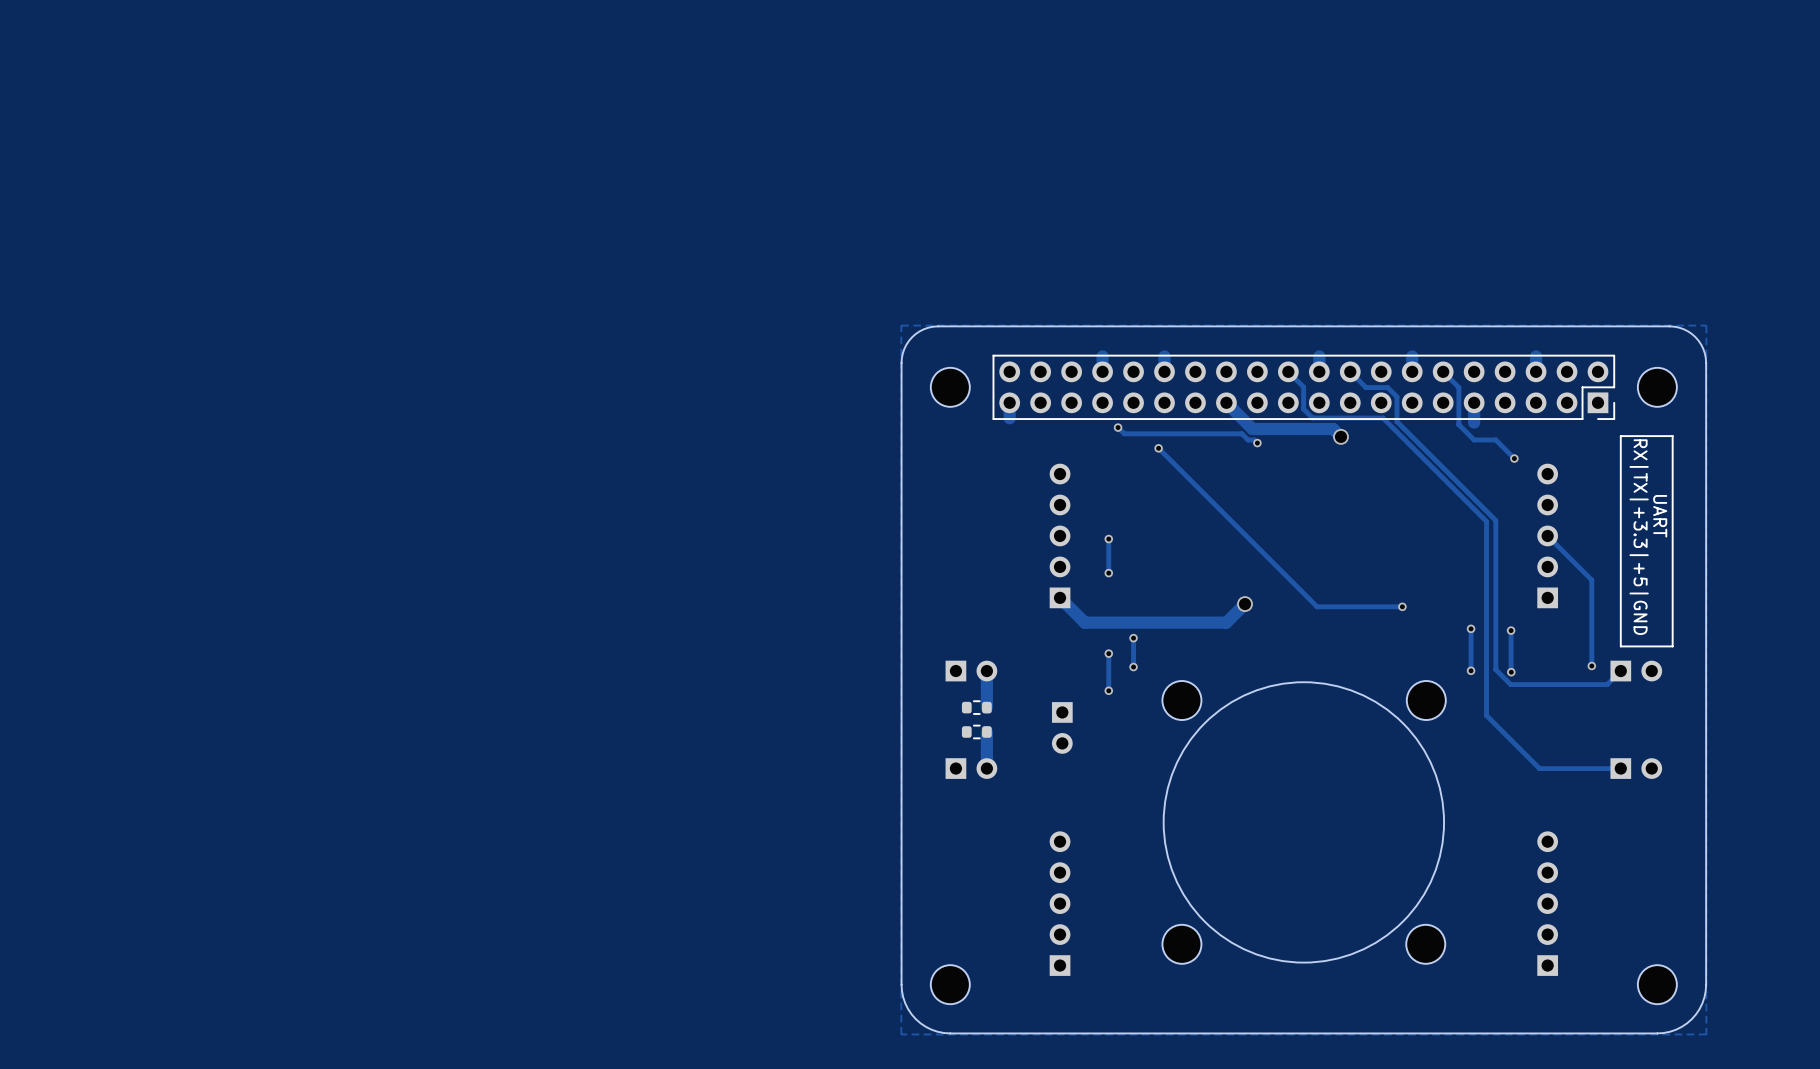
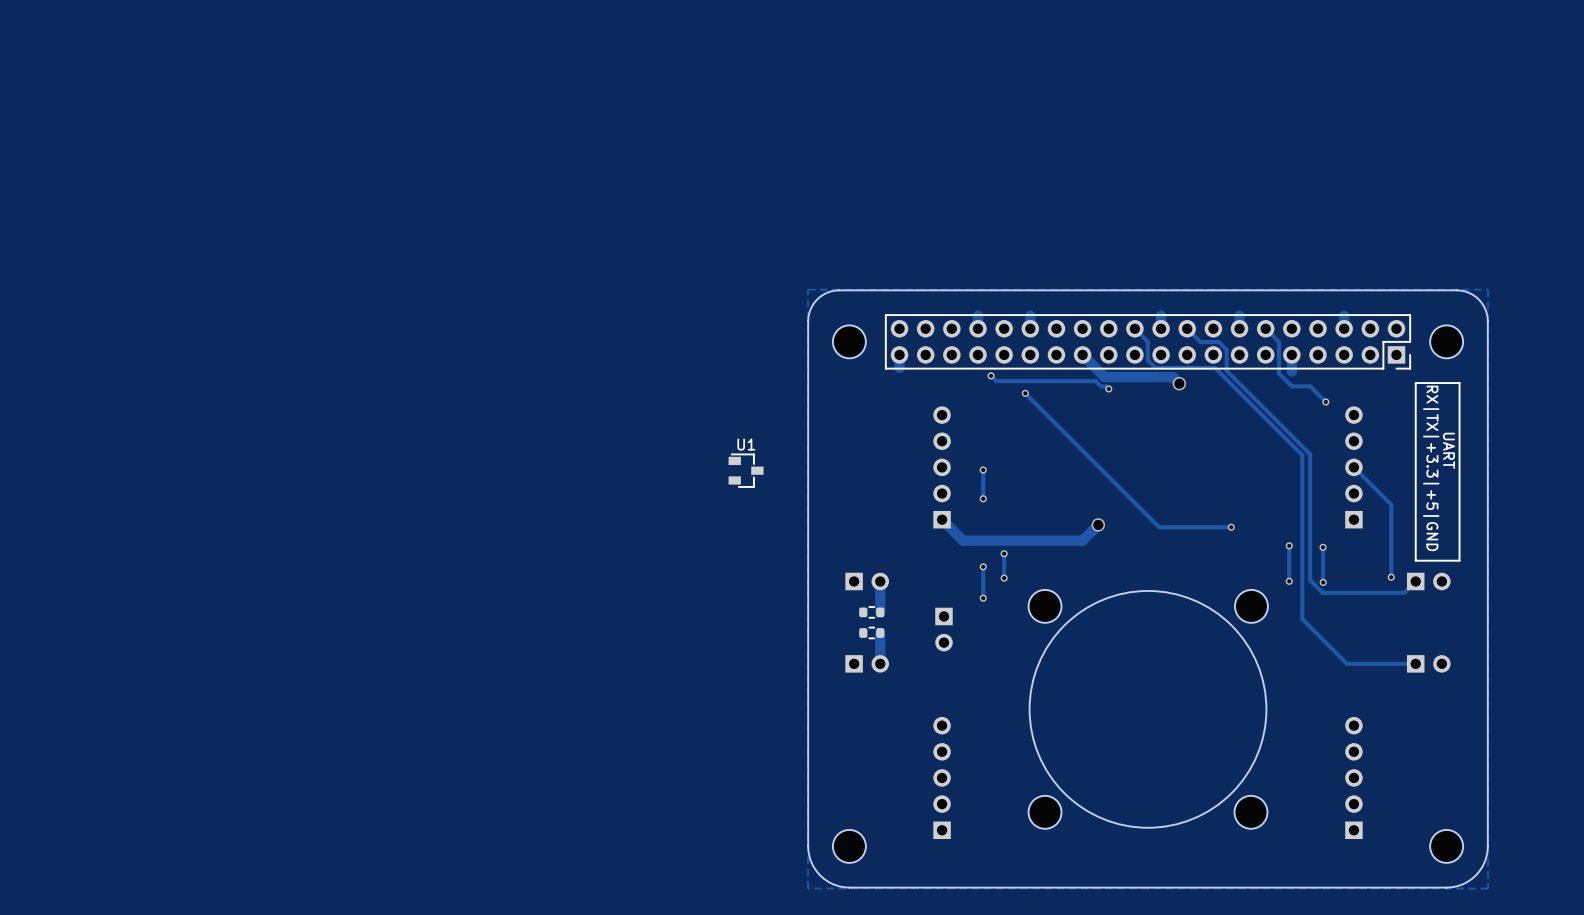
U1: none -> (746, 470)

